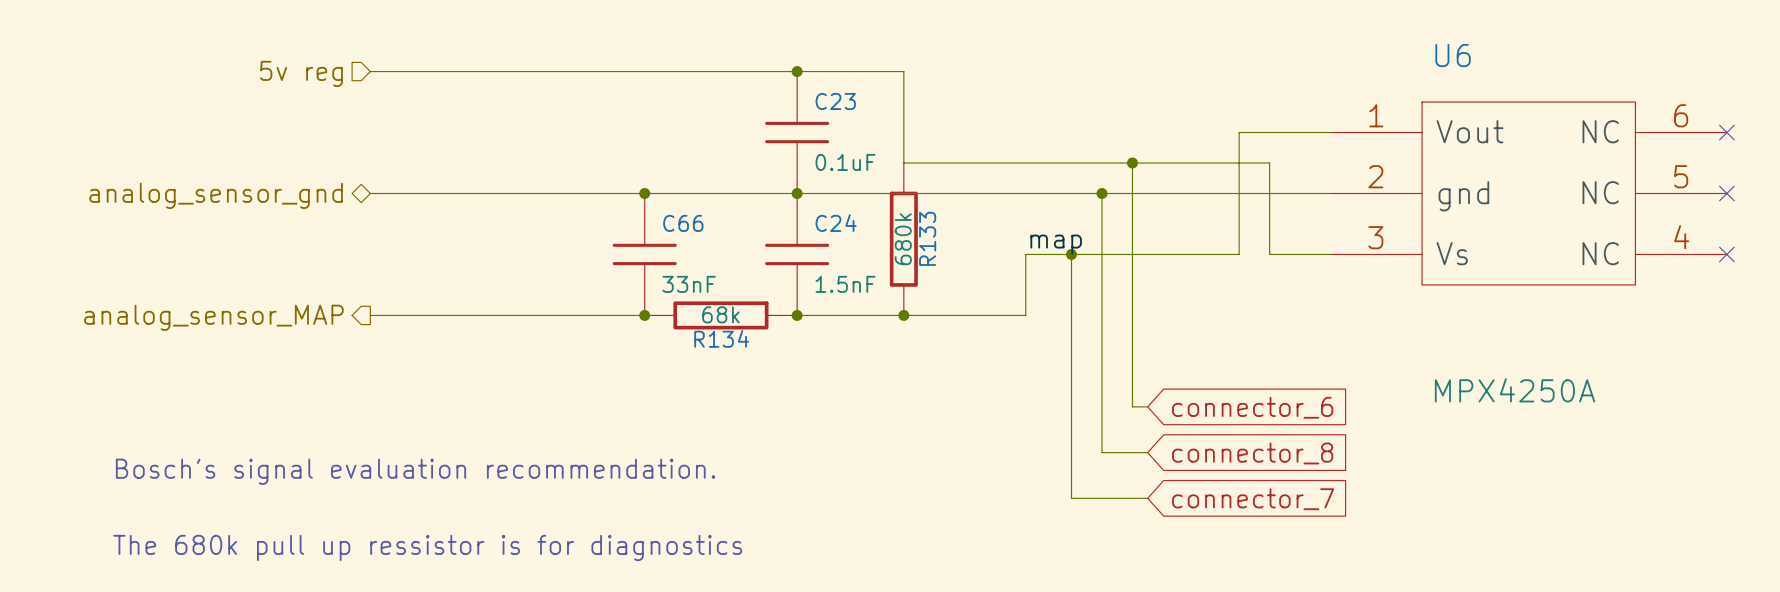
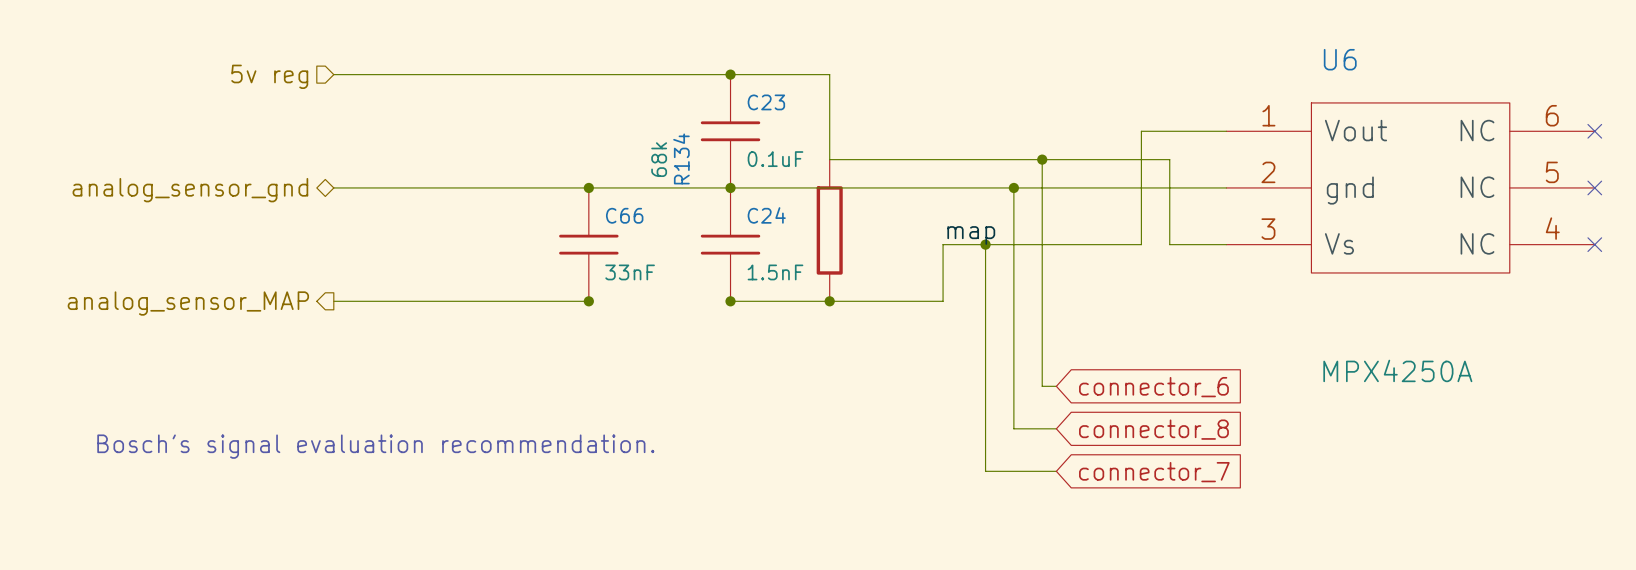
R133 name: R133 (927, 238) -> R134 (681, 158)
R133 value: 680k (903, 239) -> 68k (659, 159)
R134: 68k (720, 315) -> none
text: The 680k pull up ressistor is for diagnostics (427, 547) -> none

